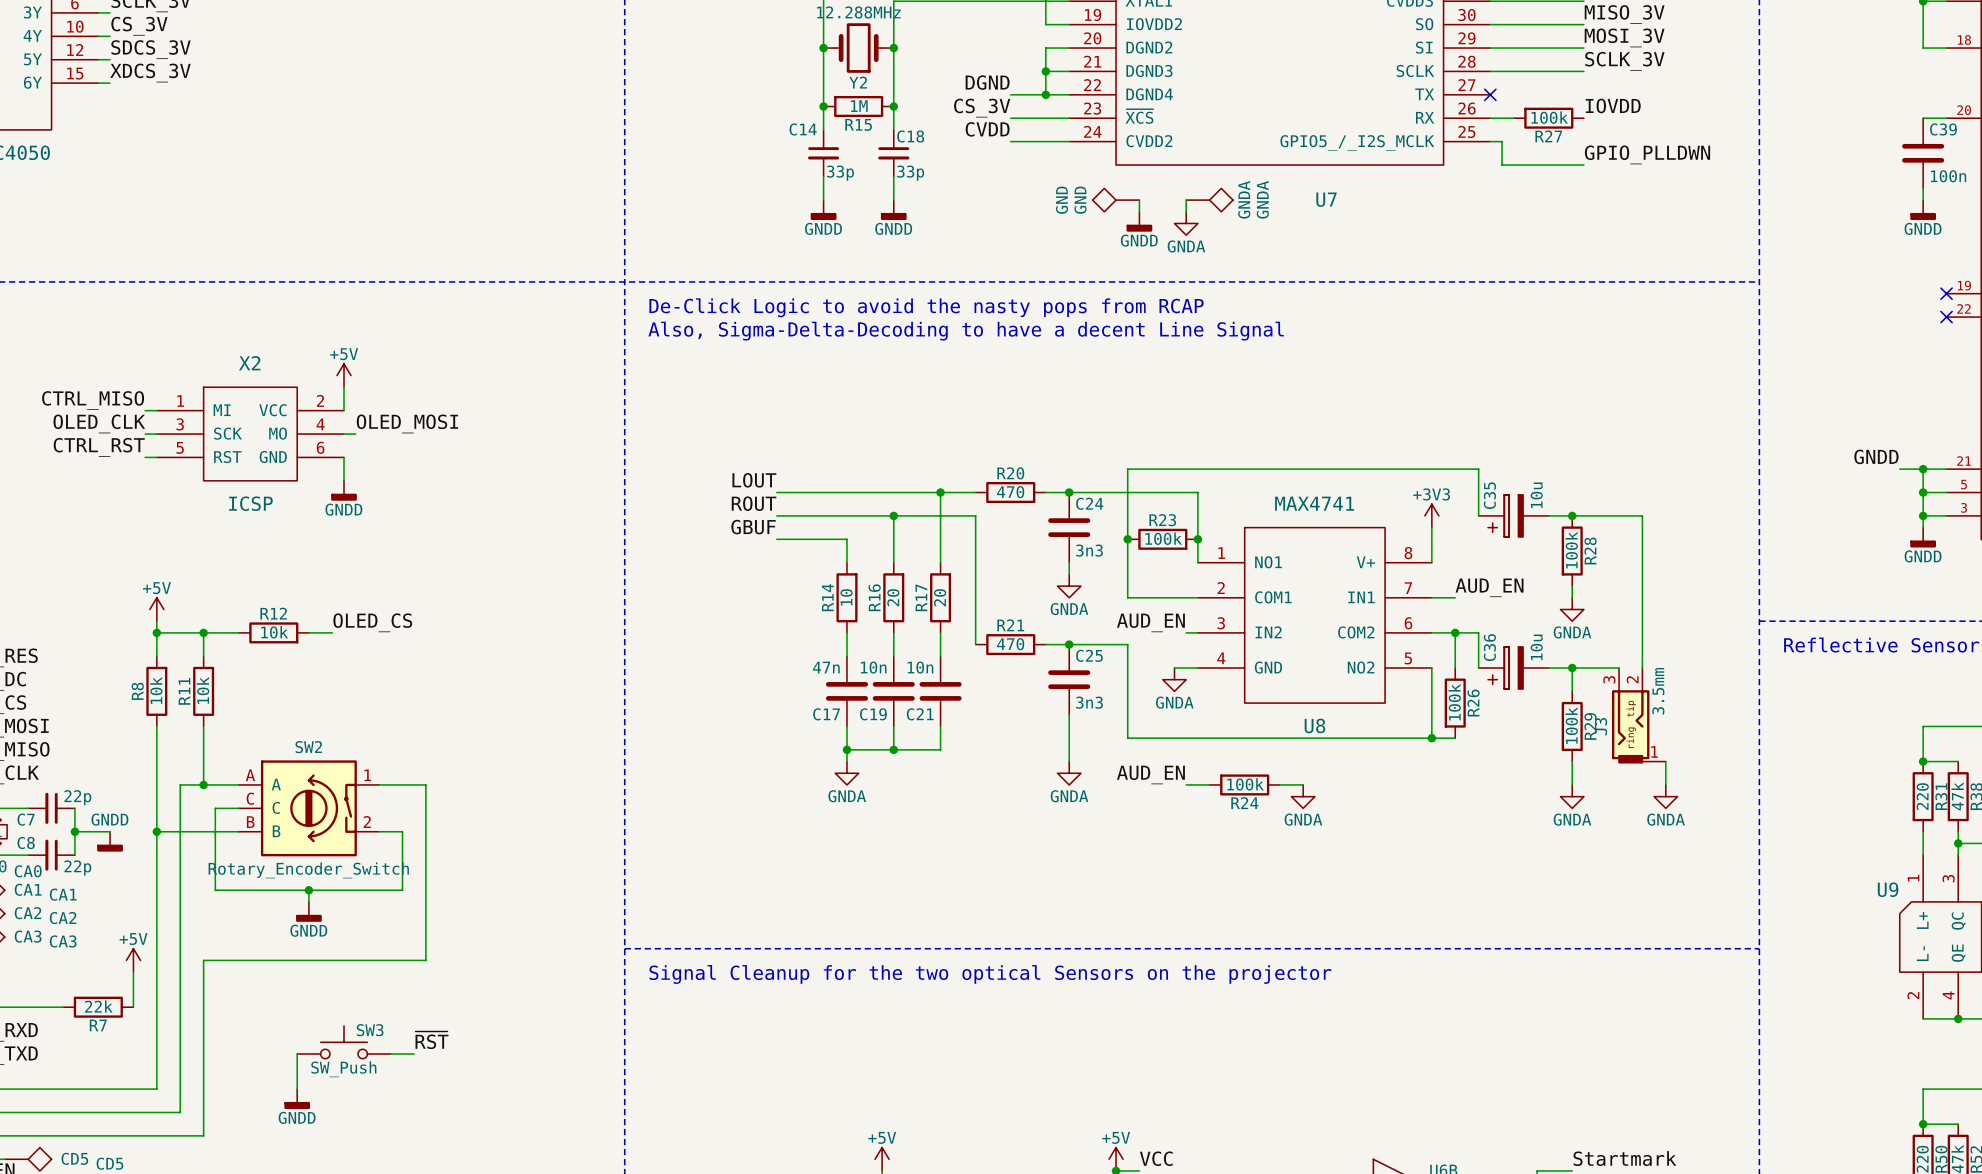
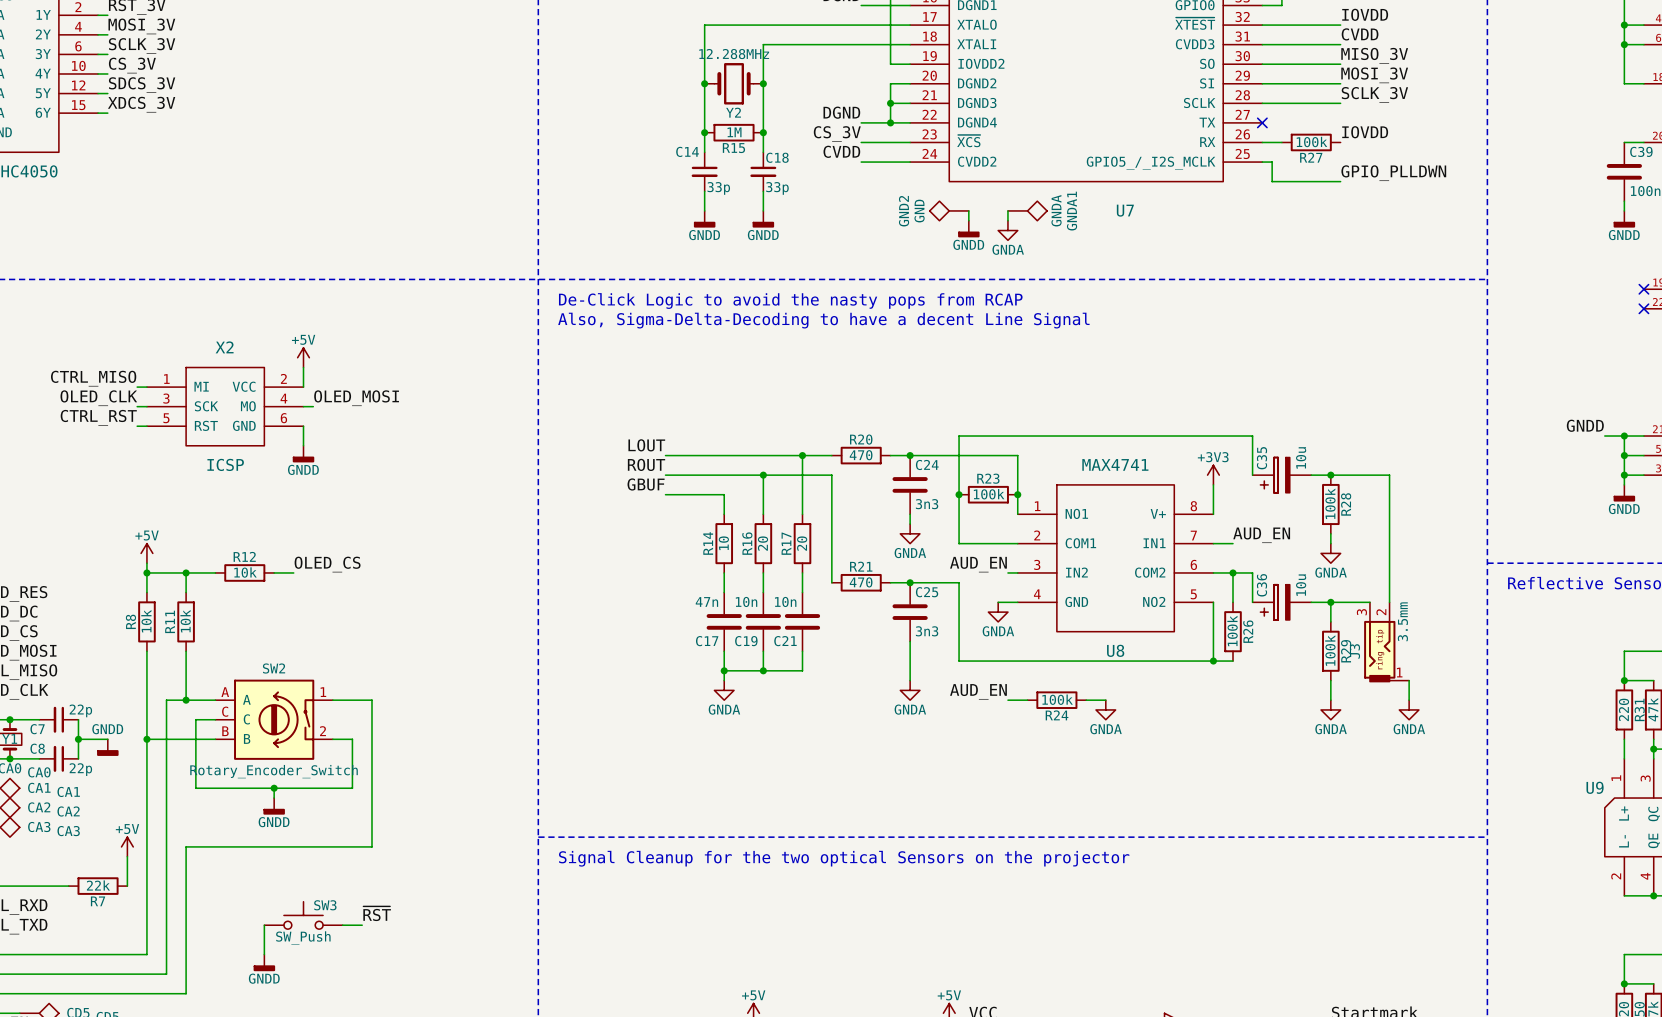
GNDA name: GNDA (1262, 199) -> GNDA1 (1072, 211)
GND name: GND (1061, 200) -> GND2 (904, 211)

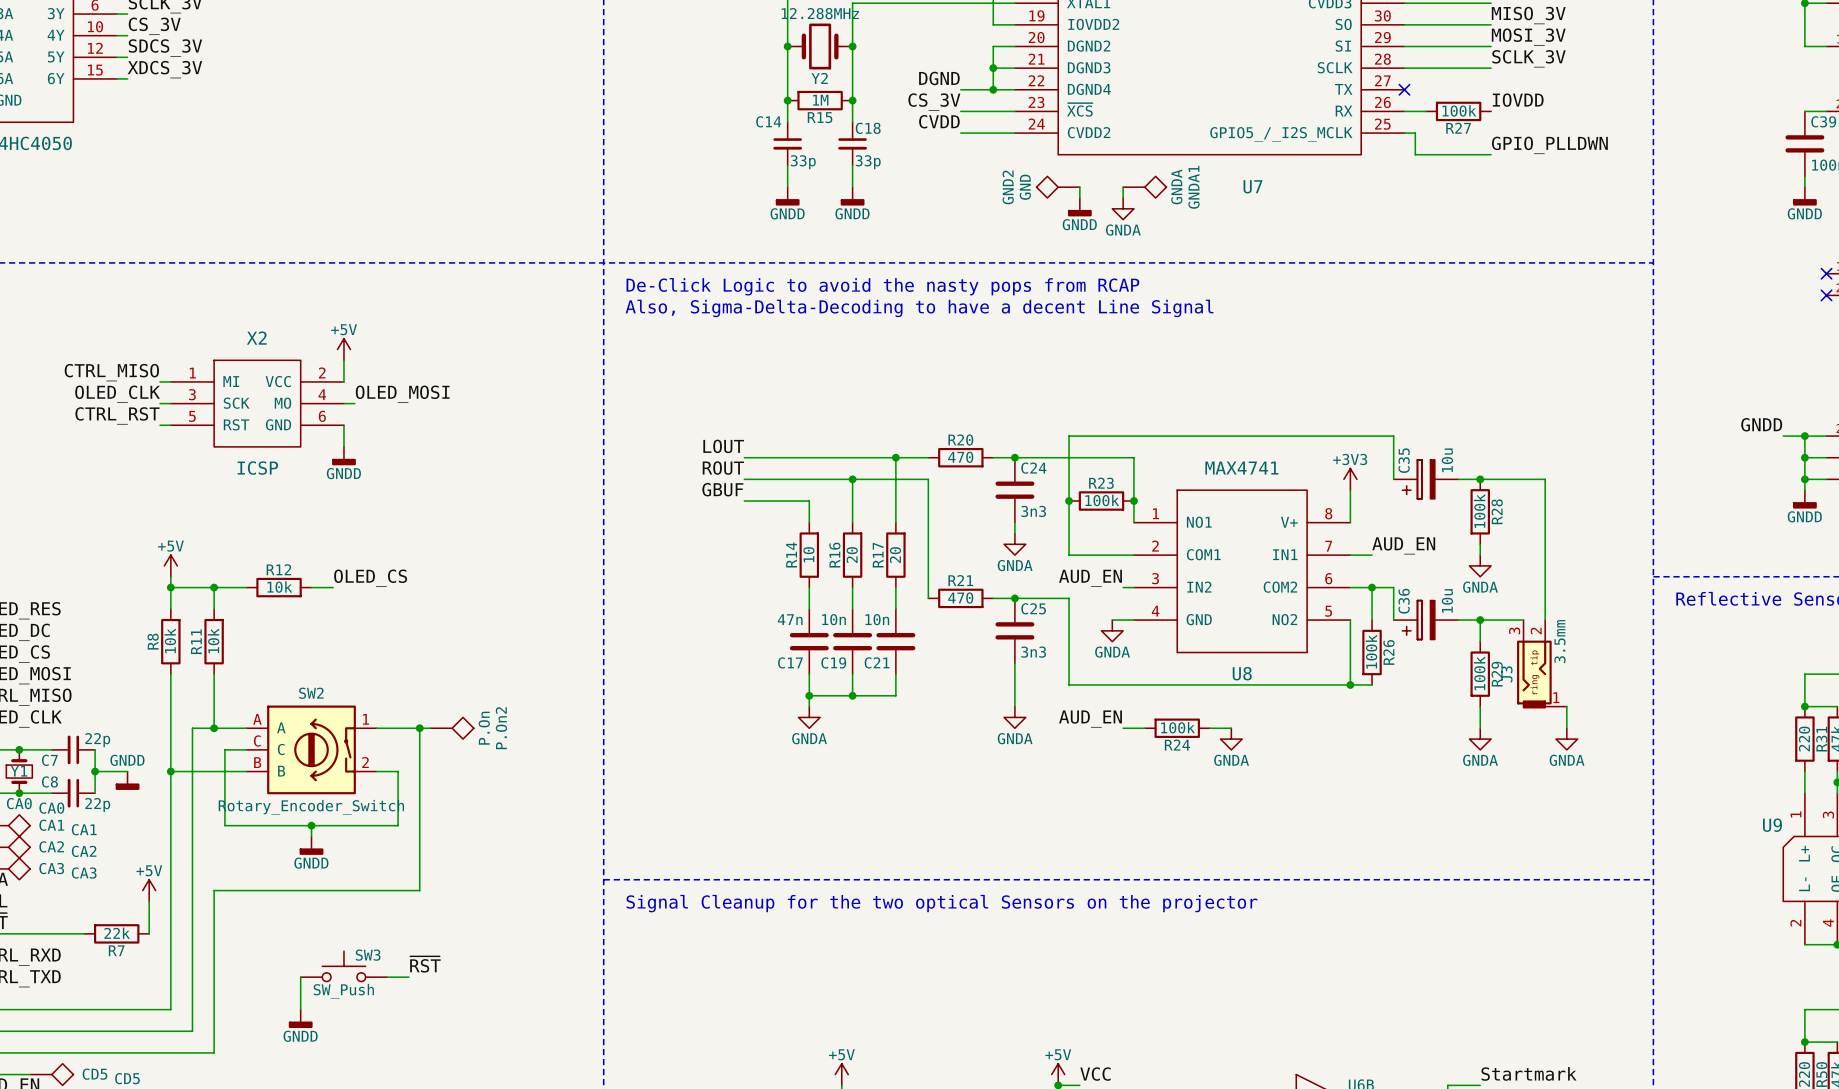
wire: none -> (419, 728) (430, 728)
junction: none -> (419, 728)
P.On2: none -> P.On (452, 728)

